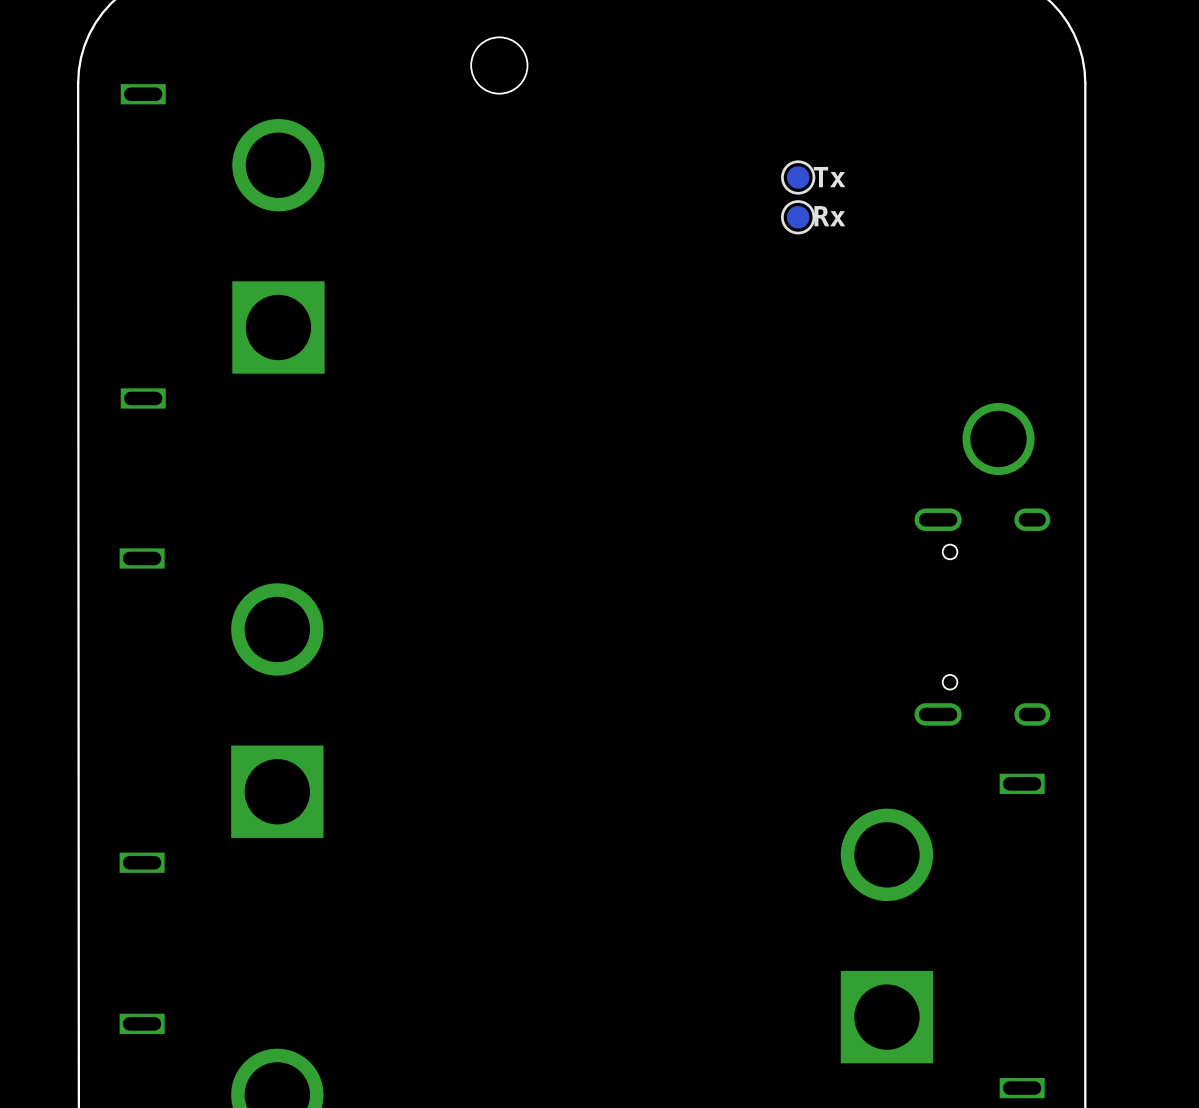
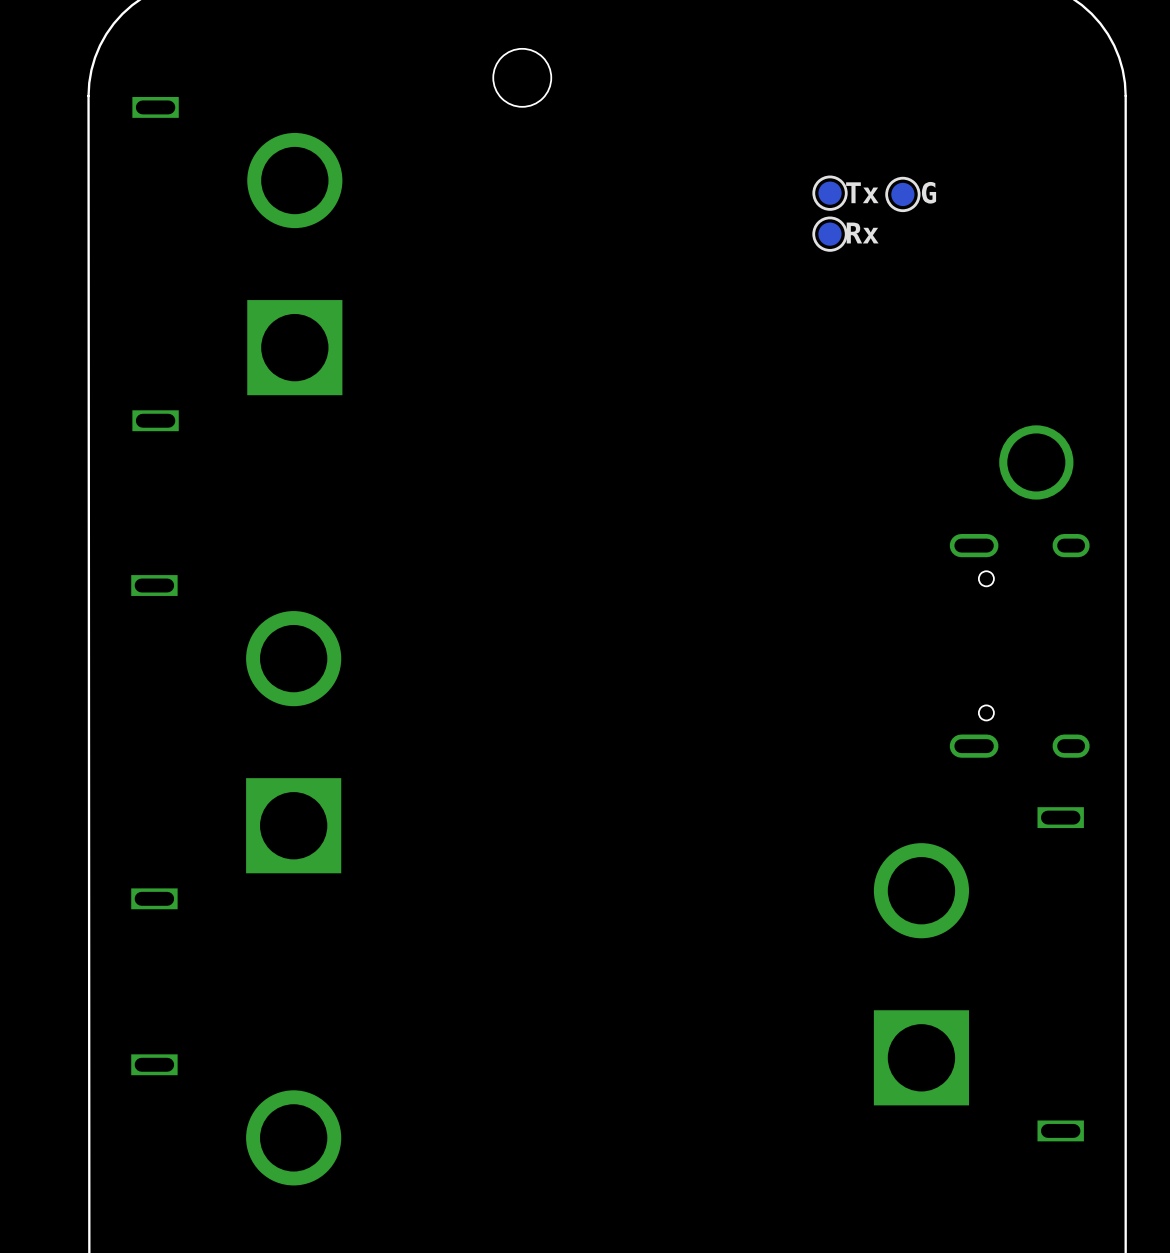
text: none -> G (929, 192)
part: none -> (902, 194)

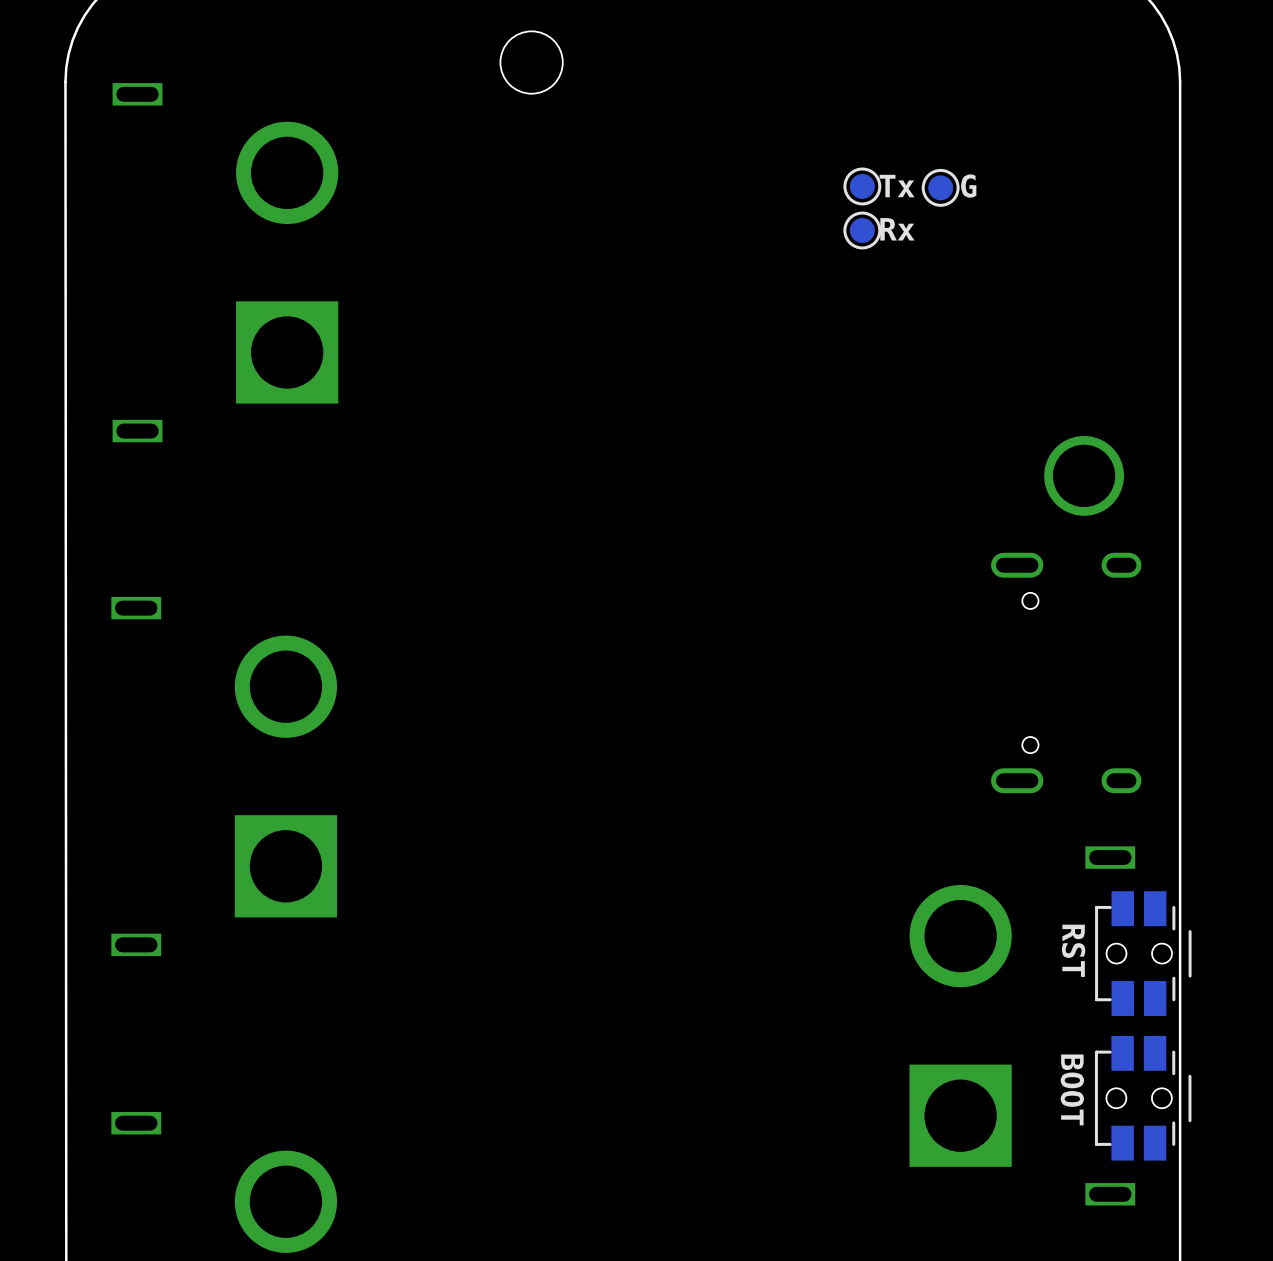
text: none -> RST (1073, 950)
part: none -> (1143, 953)
text: none -> BOOT (1072, 1089)
part: none -> (1143, 1098)

